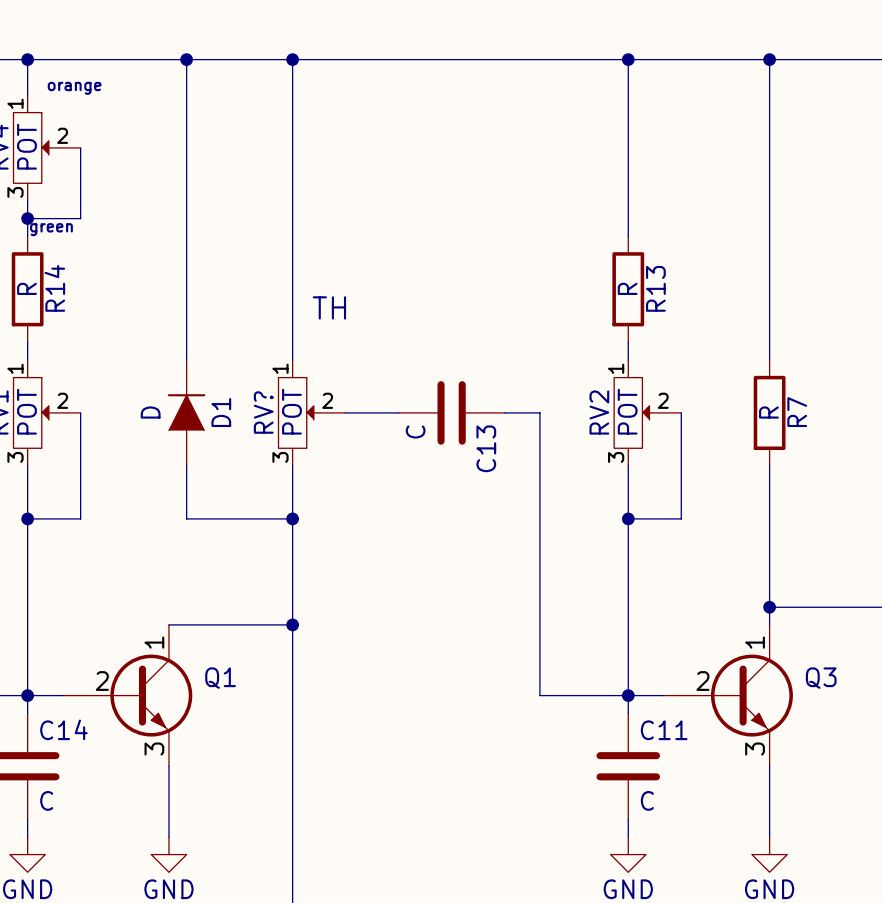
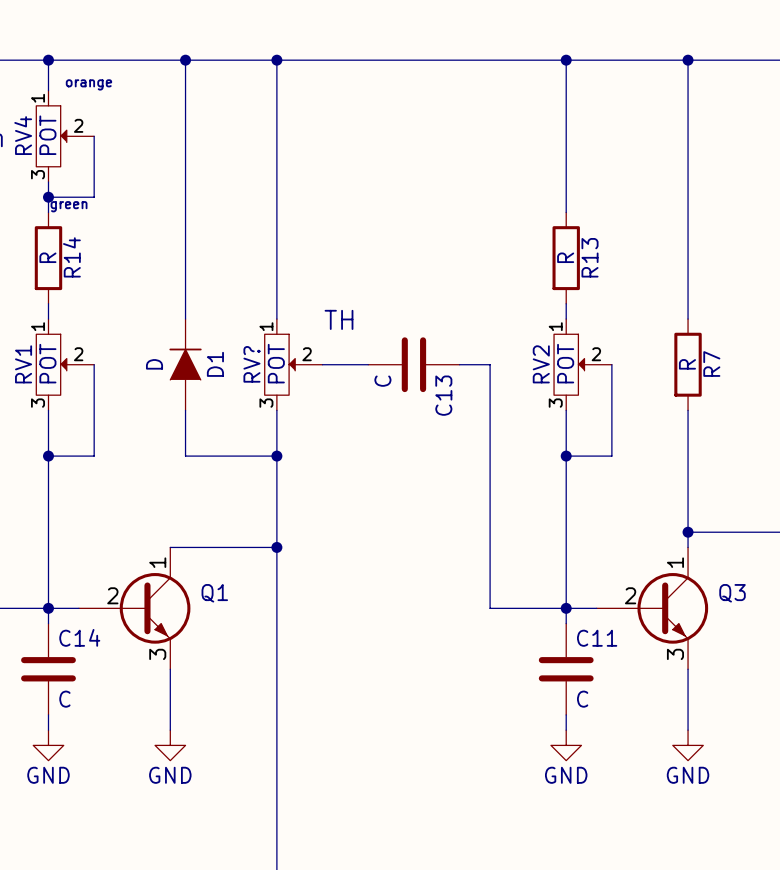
text position: TH (329, 307) -> TH (339, 319)

